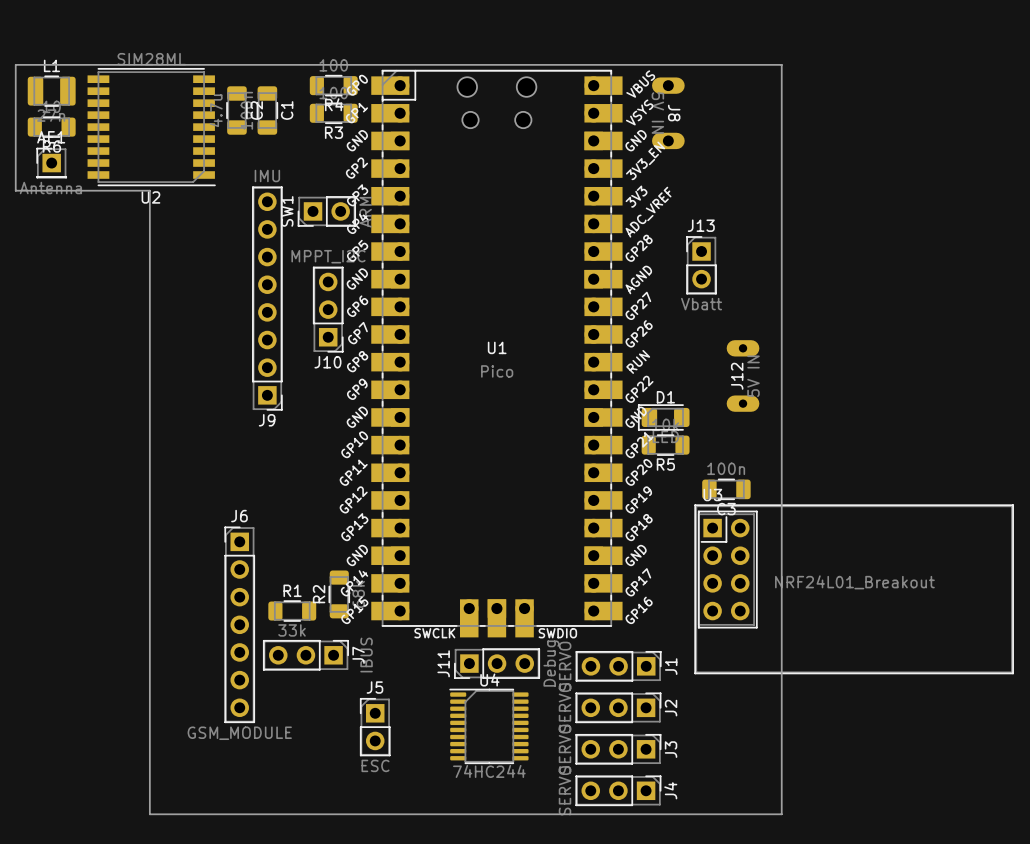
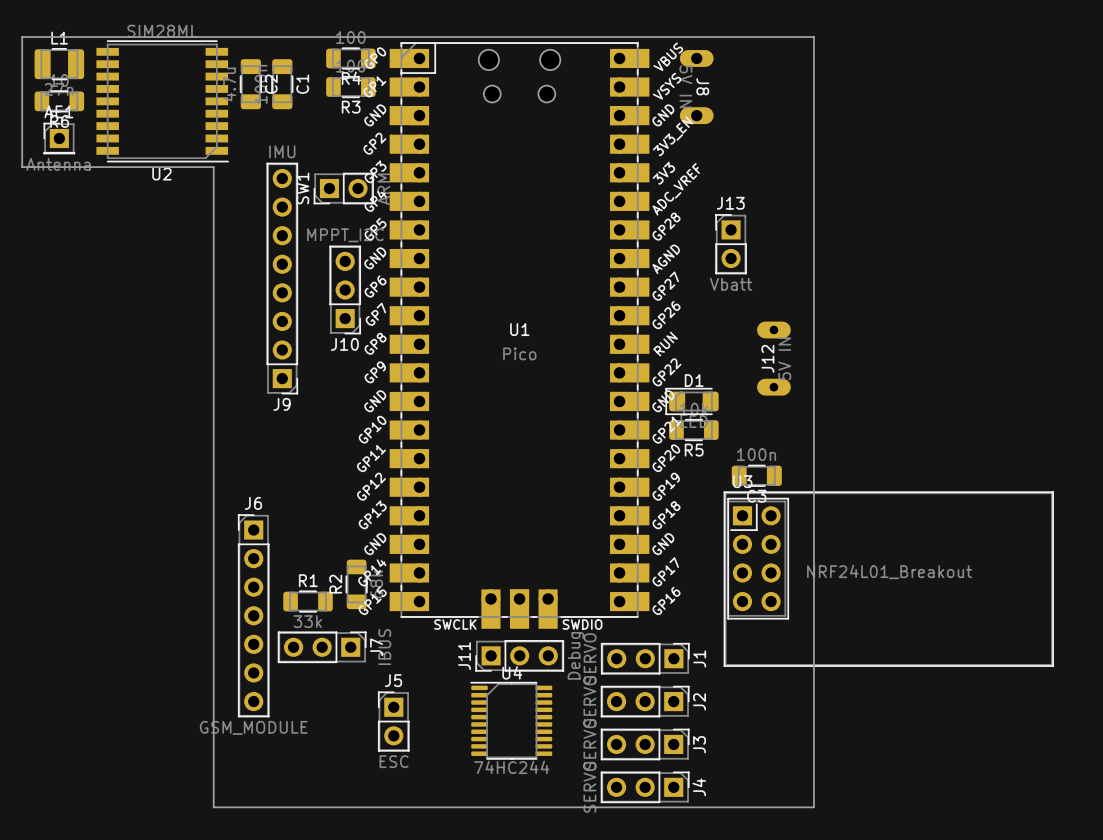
board edge: (149, 190) (149, 814) (781, 814) (781, 810) -> (160, 167) (213, 167) (213, 807) (813, 807)

